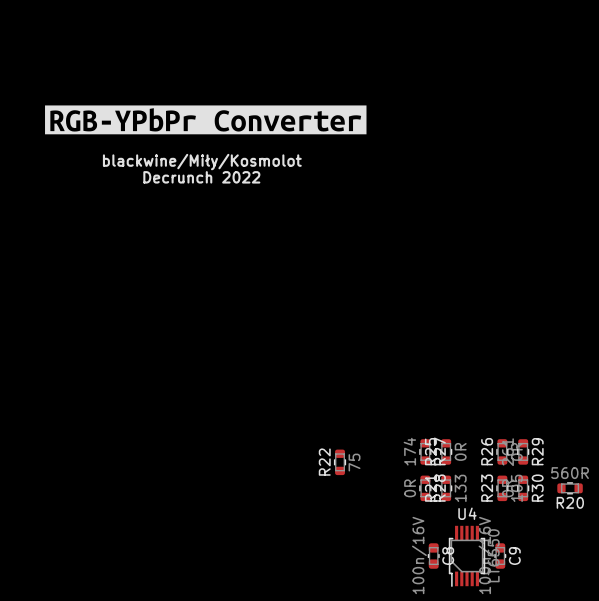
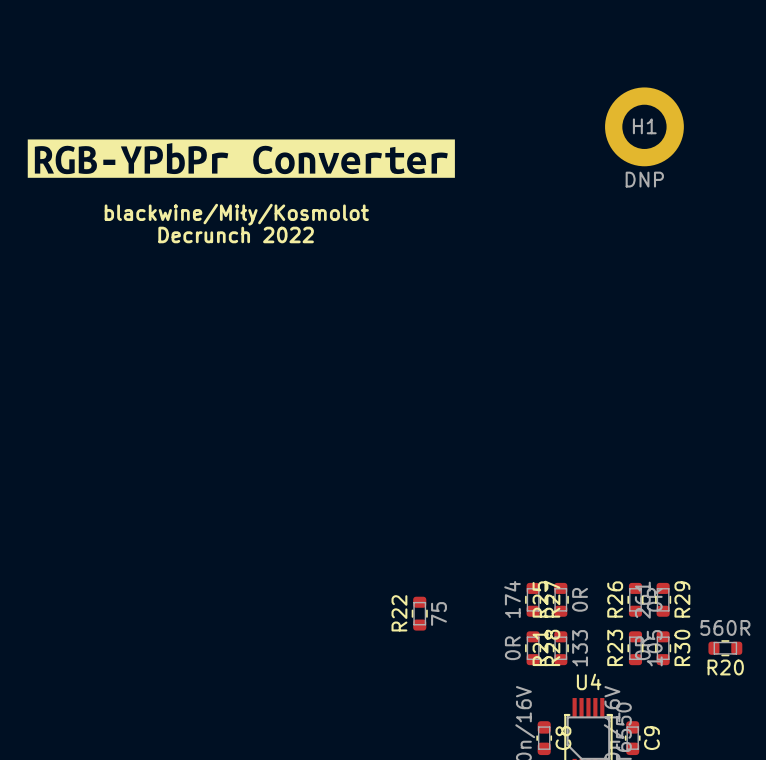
H1: none -> DNP (644, 126)

